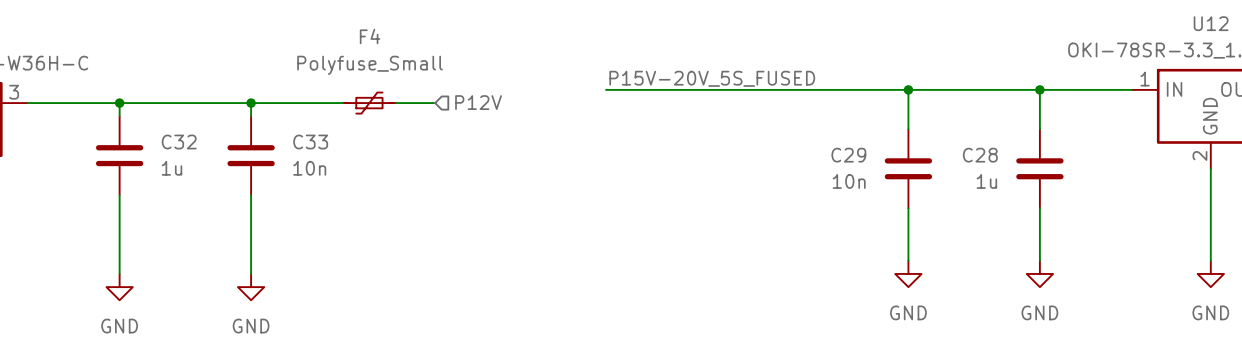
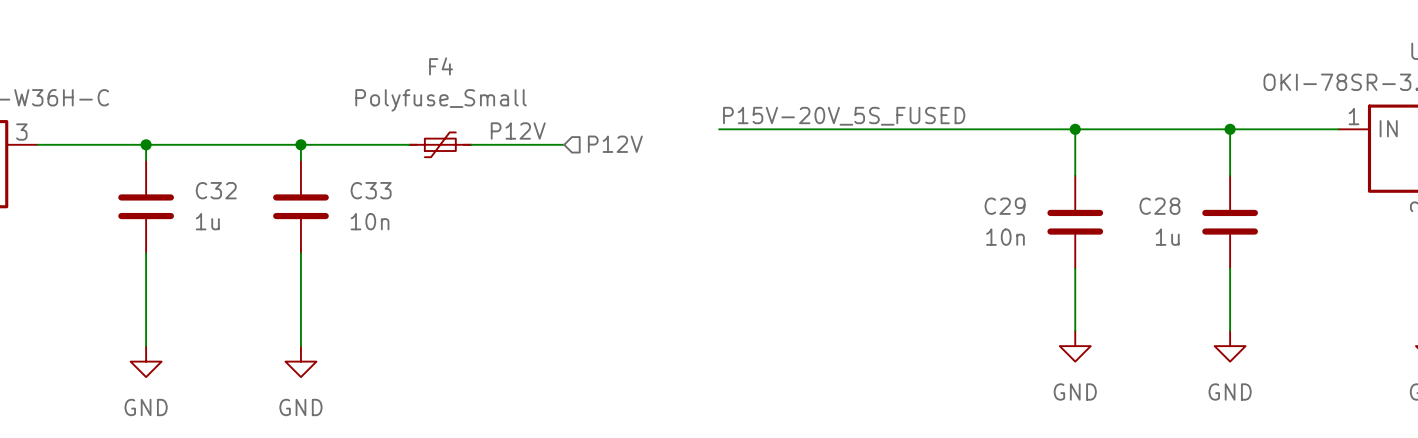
label: none -> P12V (518, 130)
hierarchical label position: P12V (478, 102) -> P12V (615, 144)
wire: none -> (517, 144) (564, 144)

